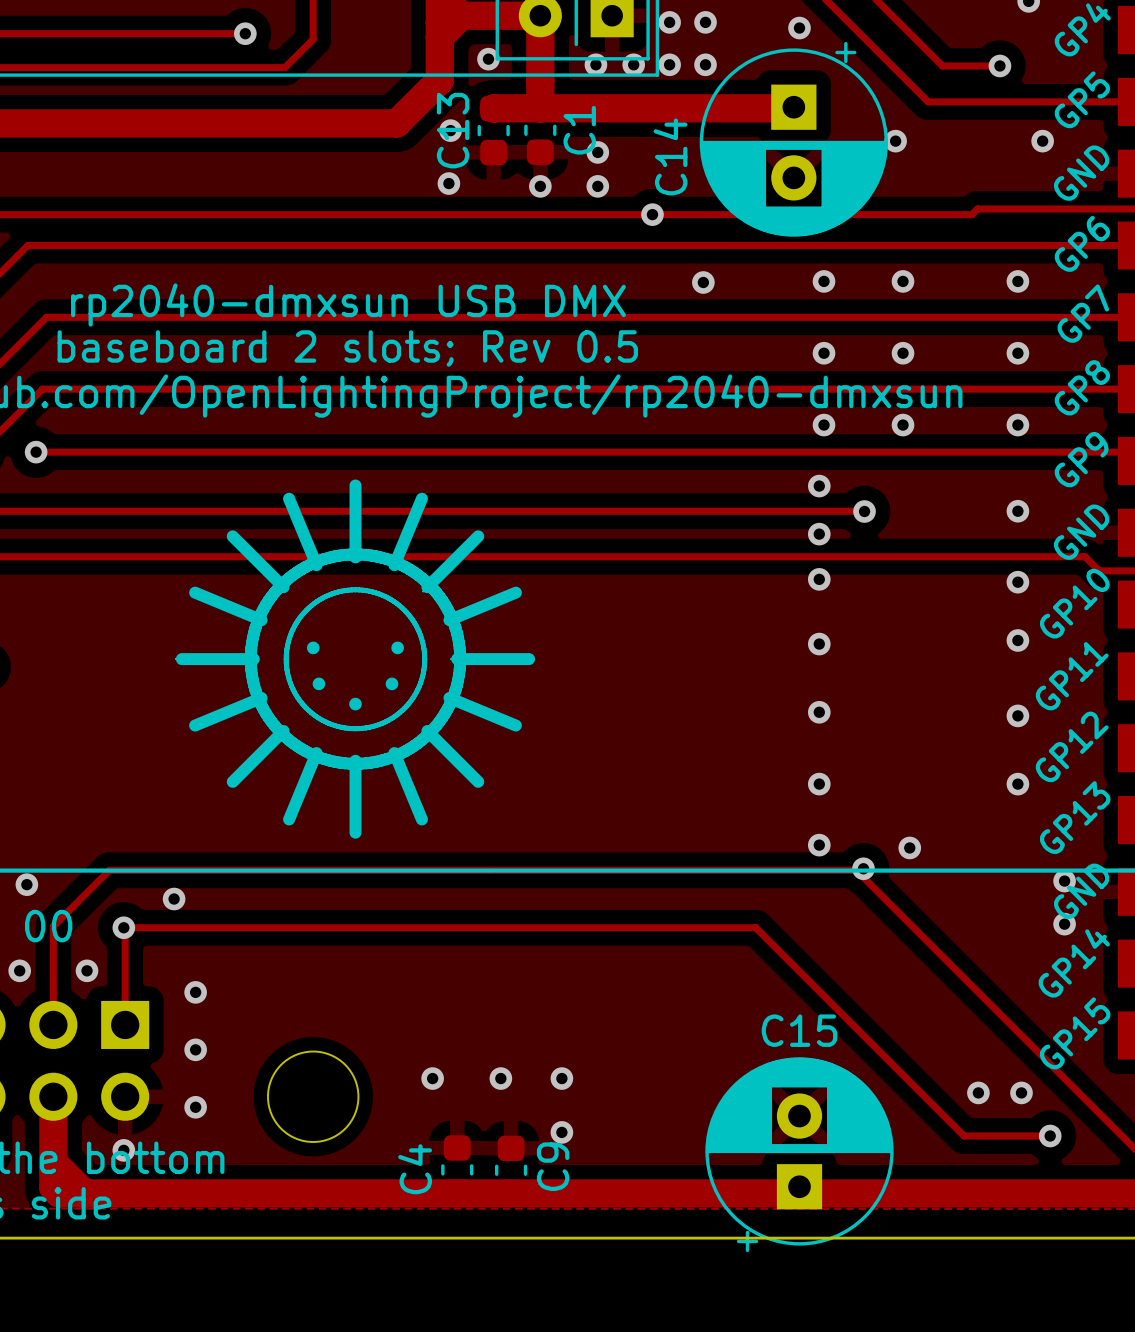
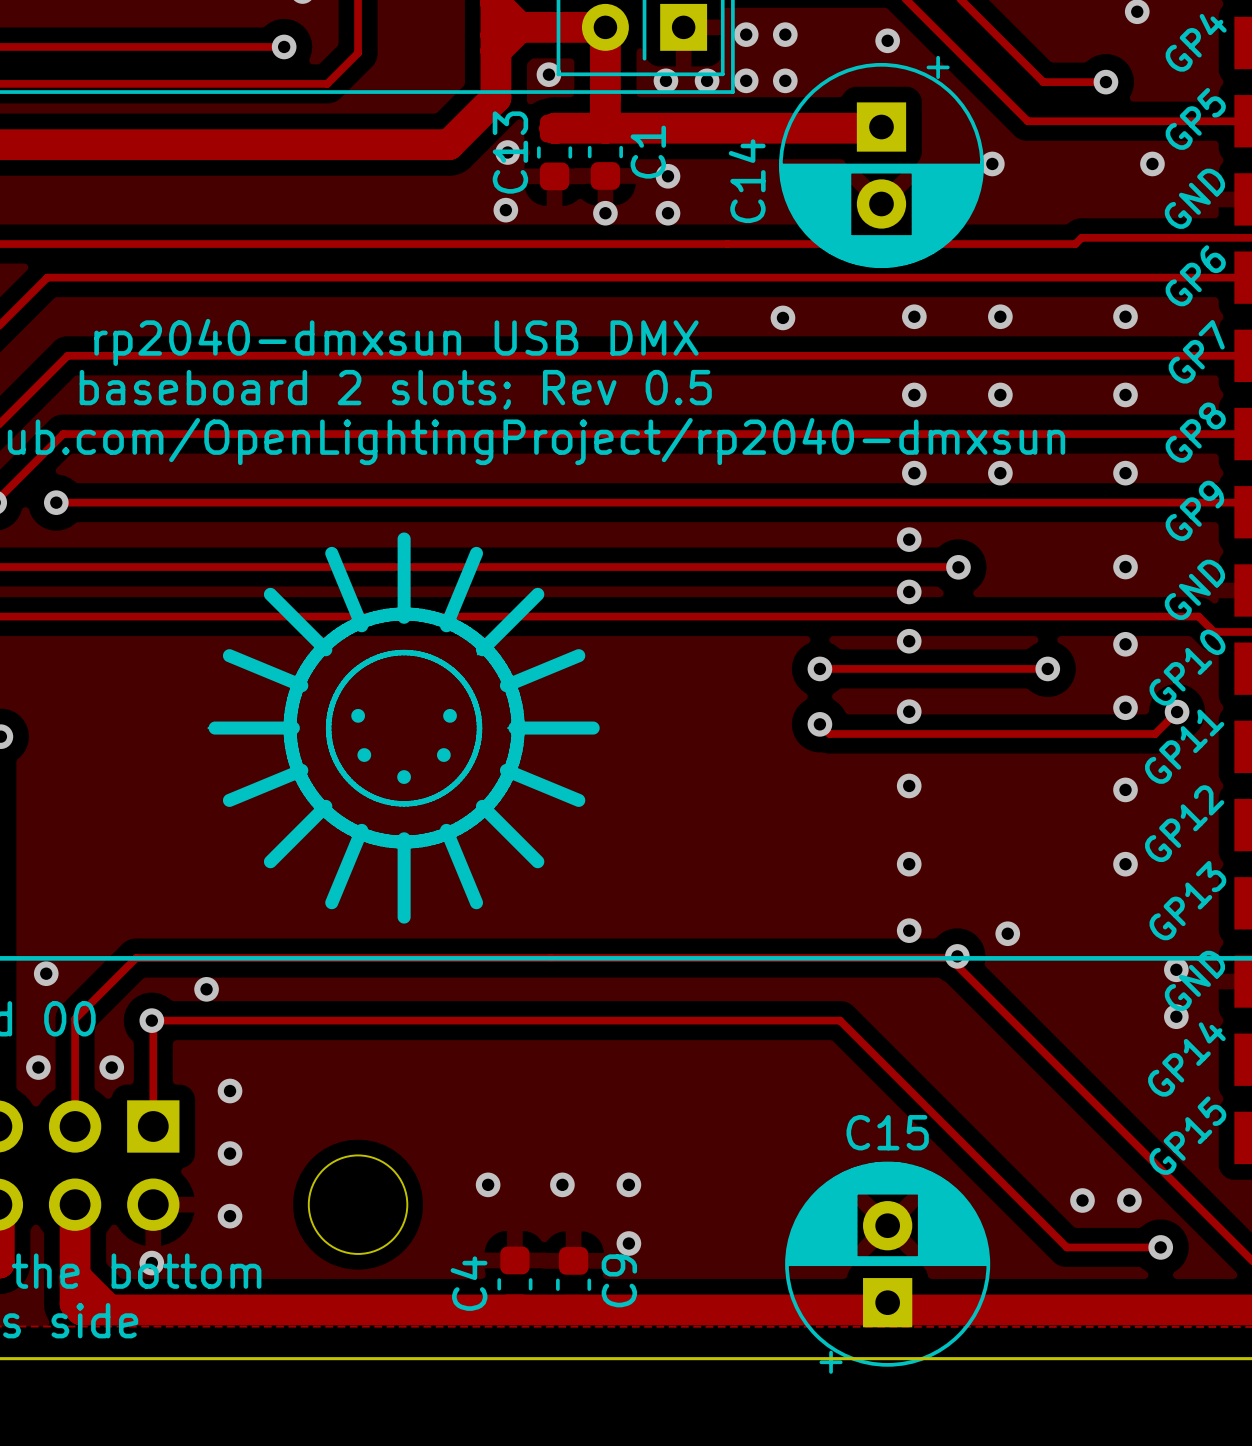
via: (652, 214) -> none
track: none -> (819, 668) (1047, 668)
via: none -> (819, 668)
via: none -> (1047, 668)
track: none -> (1177, 712) (1155, 733) (829, 733) (819, 724)
via: none -> (1177, 712)
via: none -> (819, 724)

